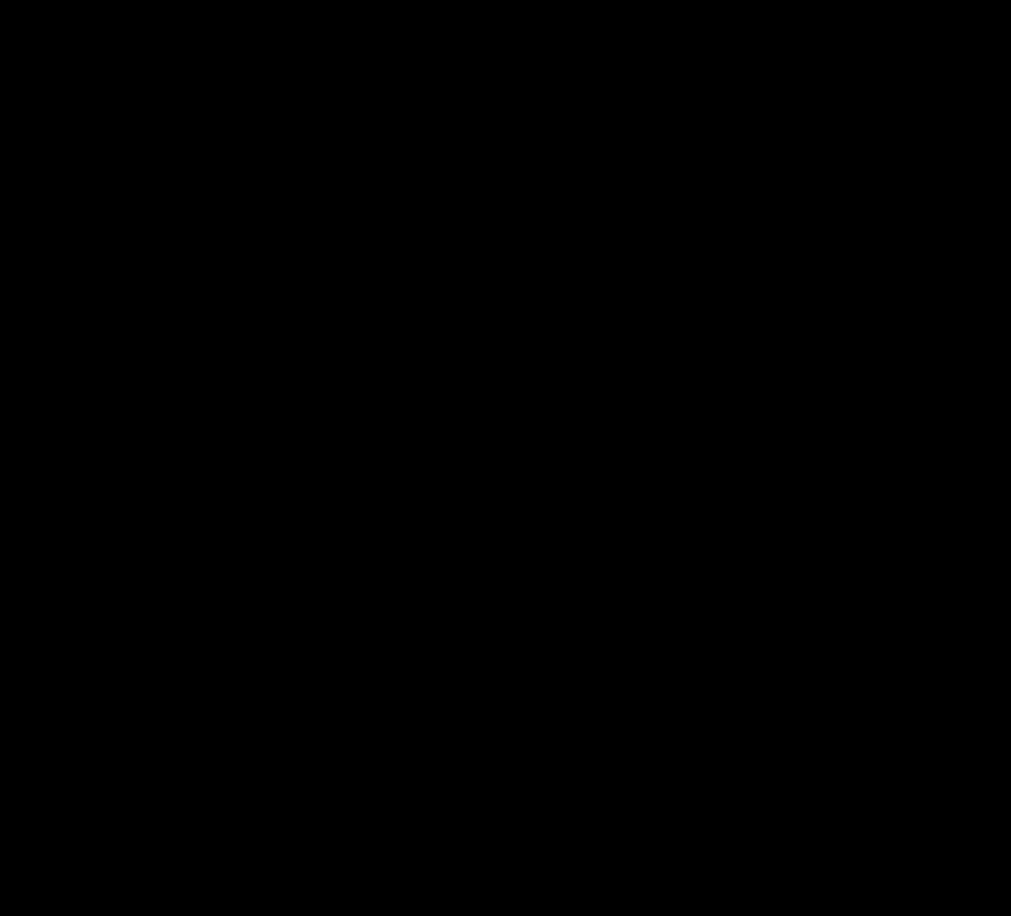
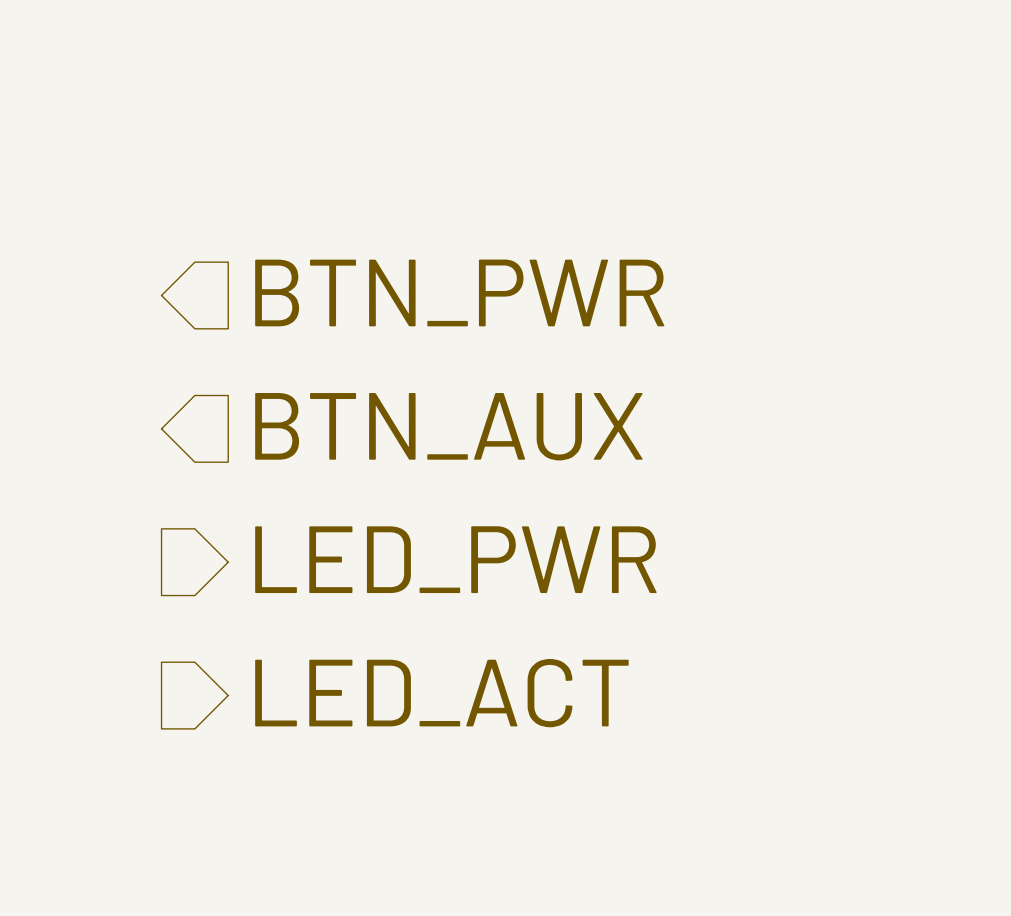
hierarchical label: none -> BTN_PWR (459, 292)
hierarchical label: none -> BTN_AUX (448, 426)
hierarchical label: none -> LED_PWR (455, 559)
hierarchical label: none -> LED_ACT (441, 693)

